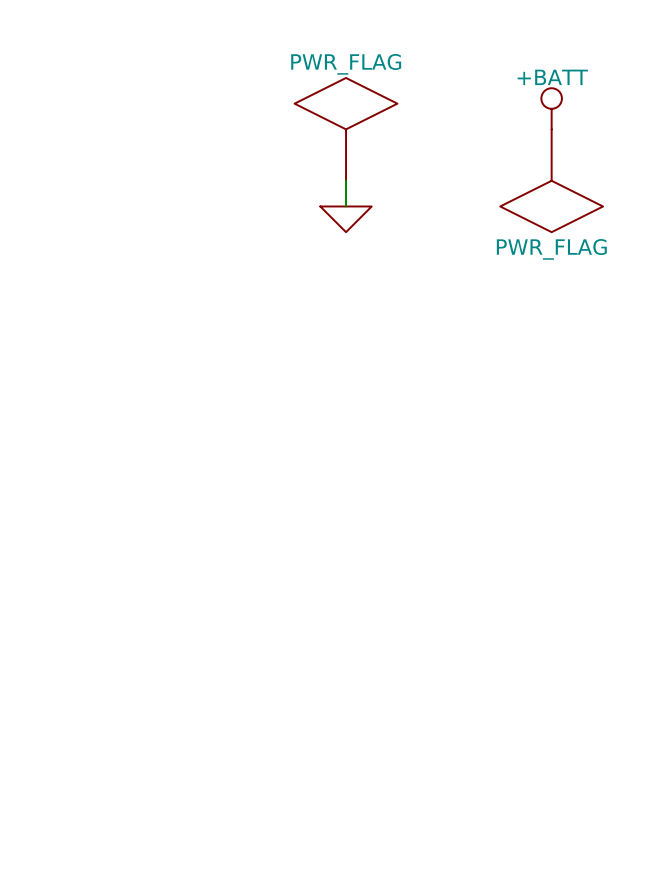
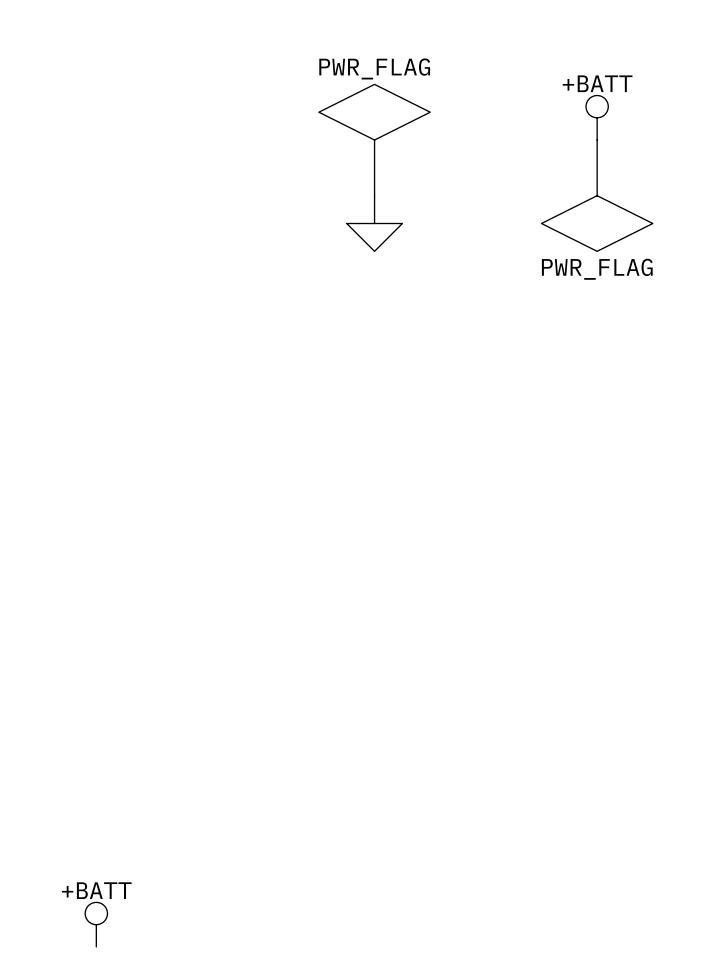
power symbol: none -> +BATT (96, 924)

